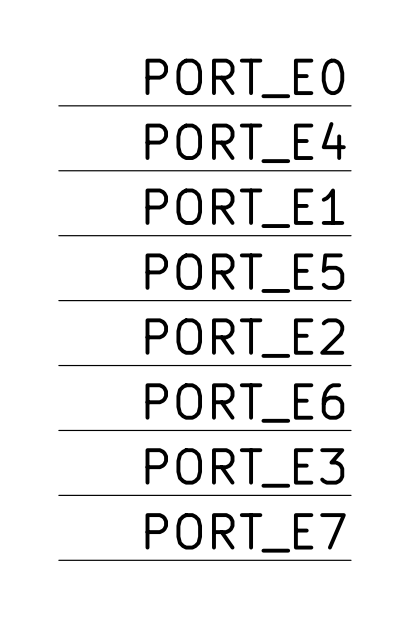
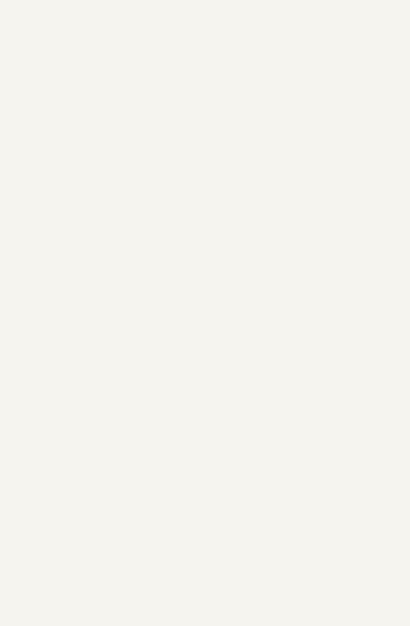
label: PORT_E0 (244, 78) -> none
wire: (58, 105) (351, 105) -> none
label: PORT_E4 (245, 142) -> none
wire: (58, 170) (351, 170) -> none
label: PORT_E1 (244, 208) -> none
wire: (58, 235) (351, 235) -> none
label: PORT_E5 (244, 273) -> none
wire: (58, 300) (351, 300) -> none
label: PORT_E2 (244, 338) -> none
wire: (58, 365) (351, 365) -> none
label: PORT_E6 (244, 403) -> none
wire: (58, 430) (351, 430) -> none
label: PORT_E3 (244, 467) -> none
wire: (58, 495) (351, 495) -> none
label: PORT_E7 (245, 532) -> none
wire: (58, 560) (351, 560) -> none

